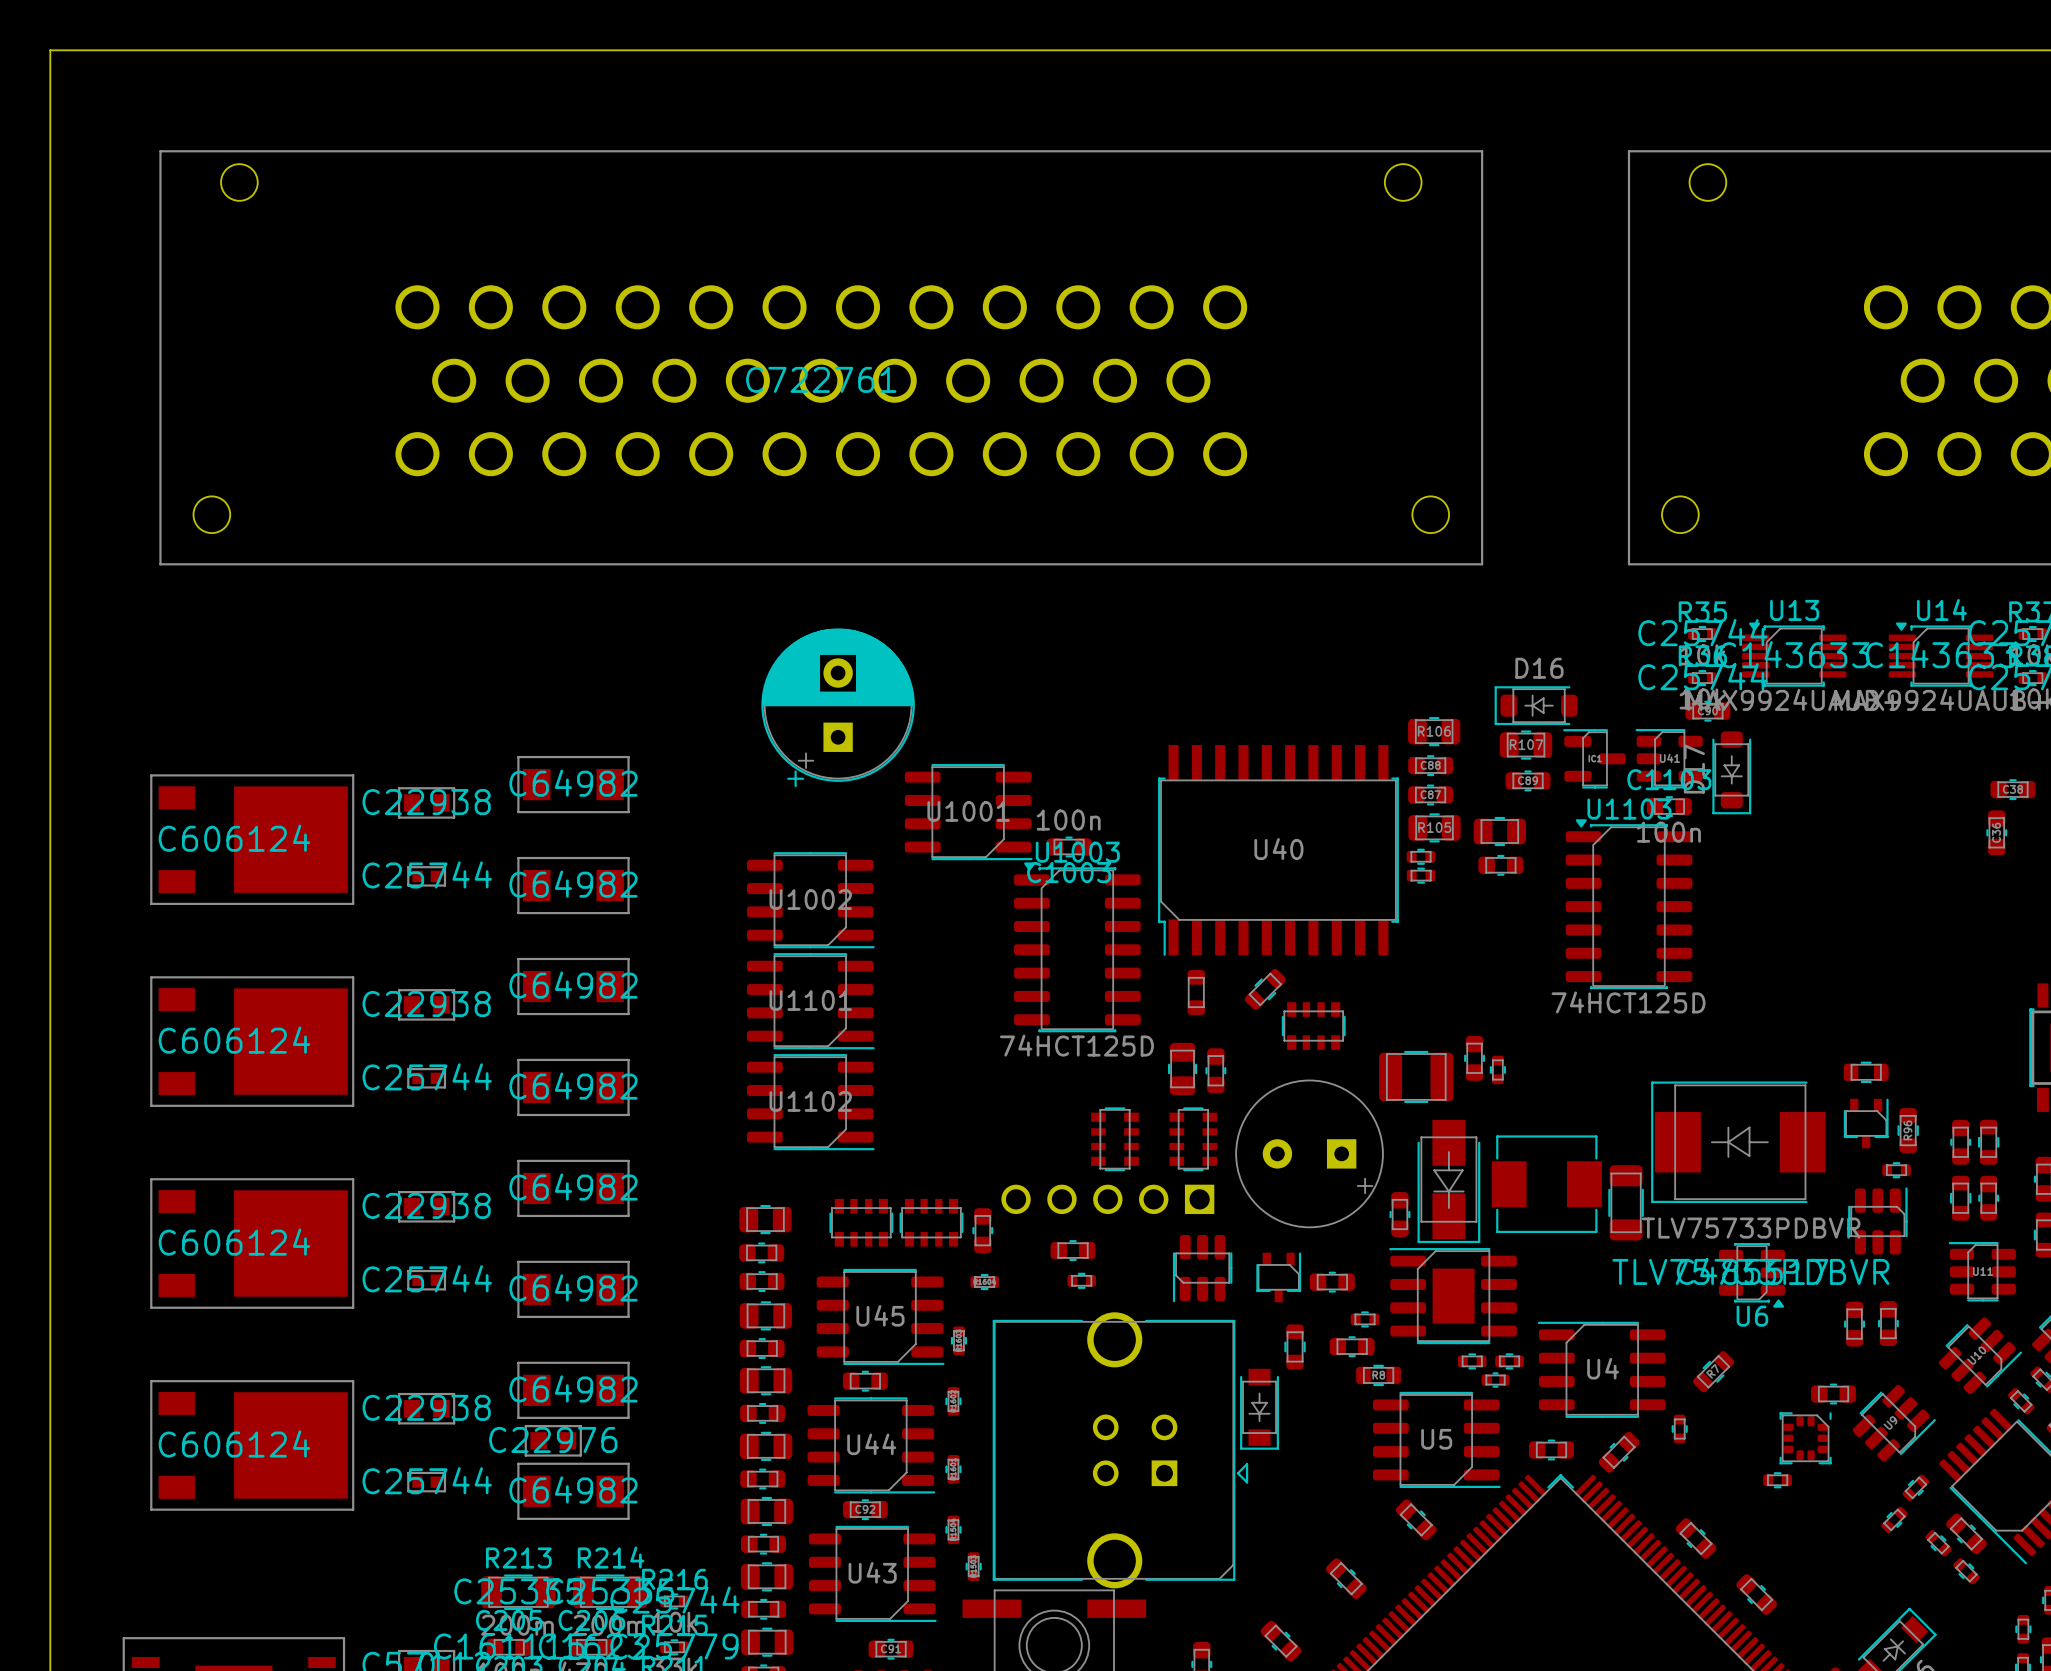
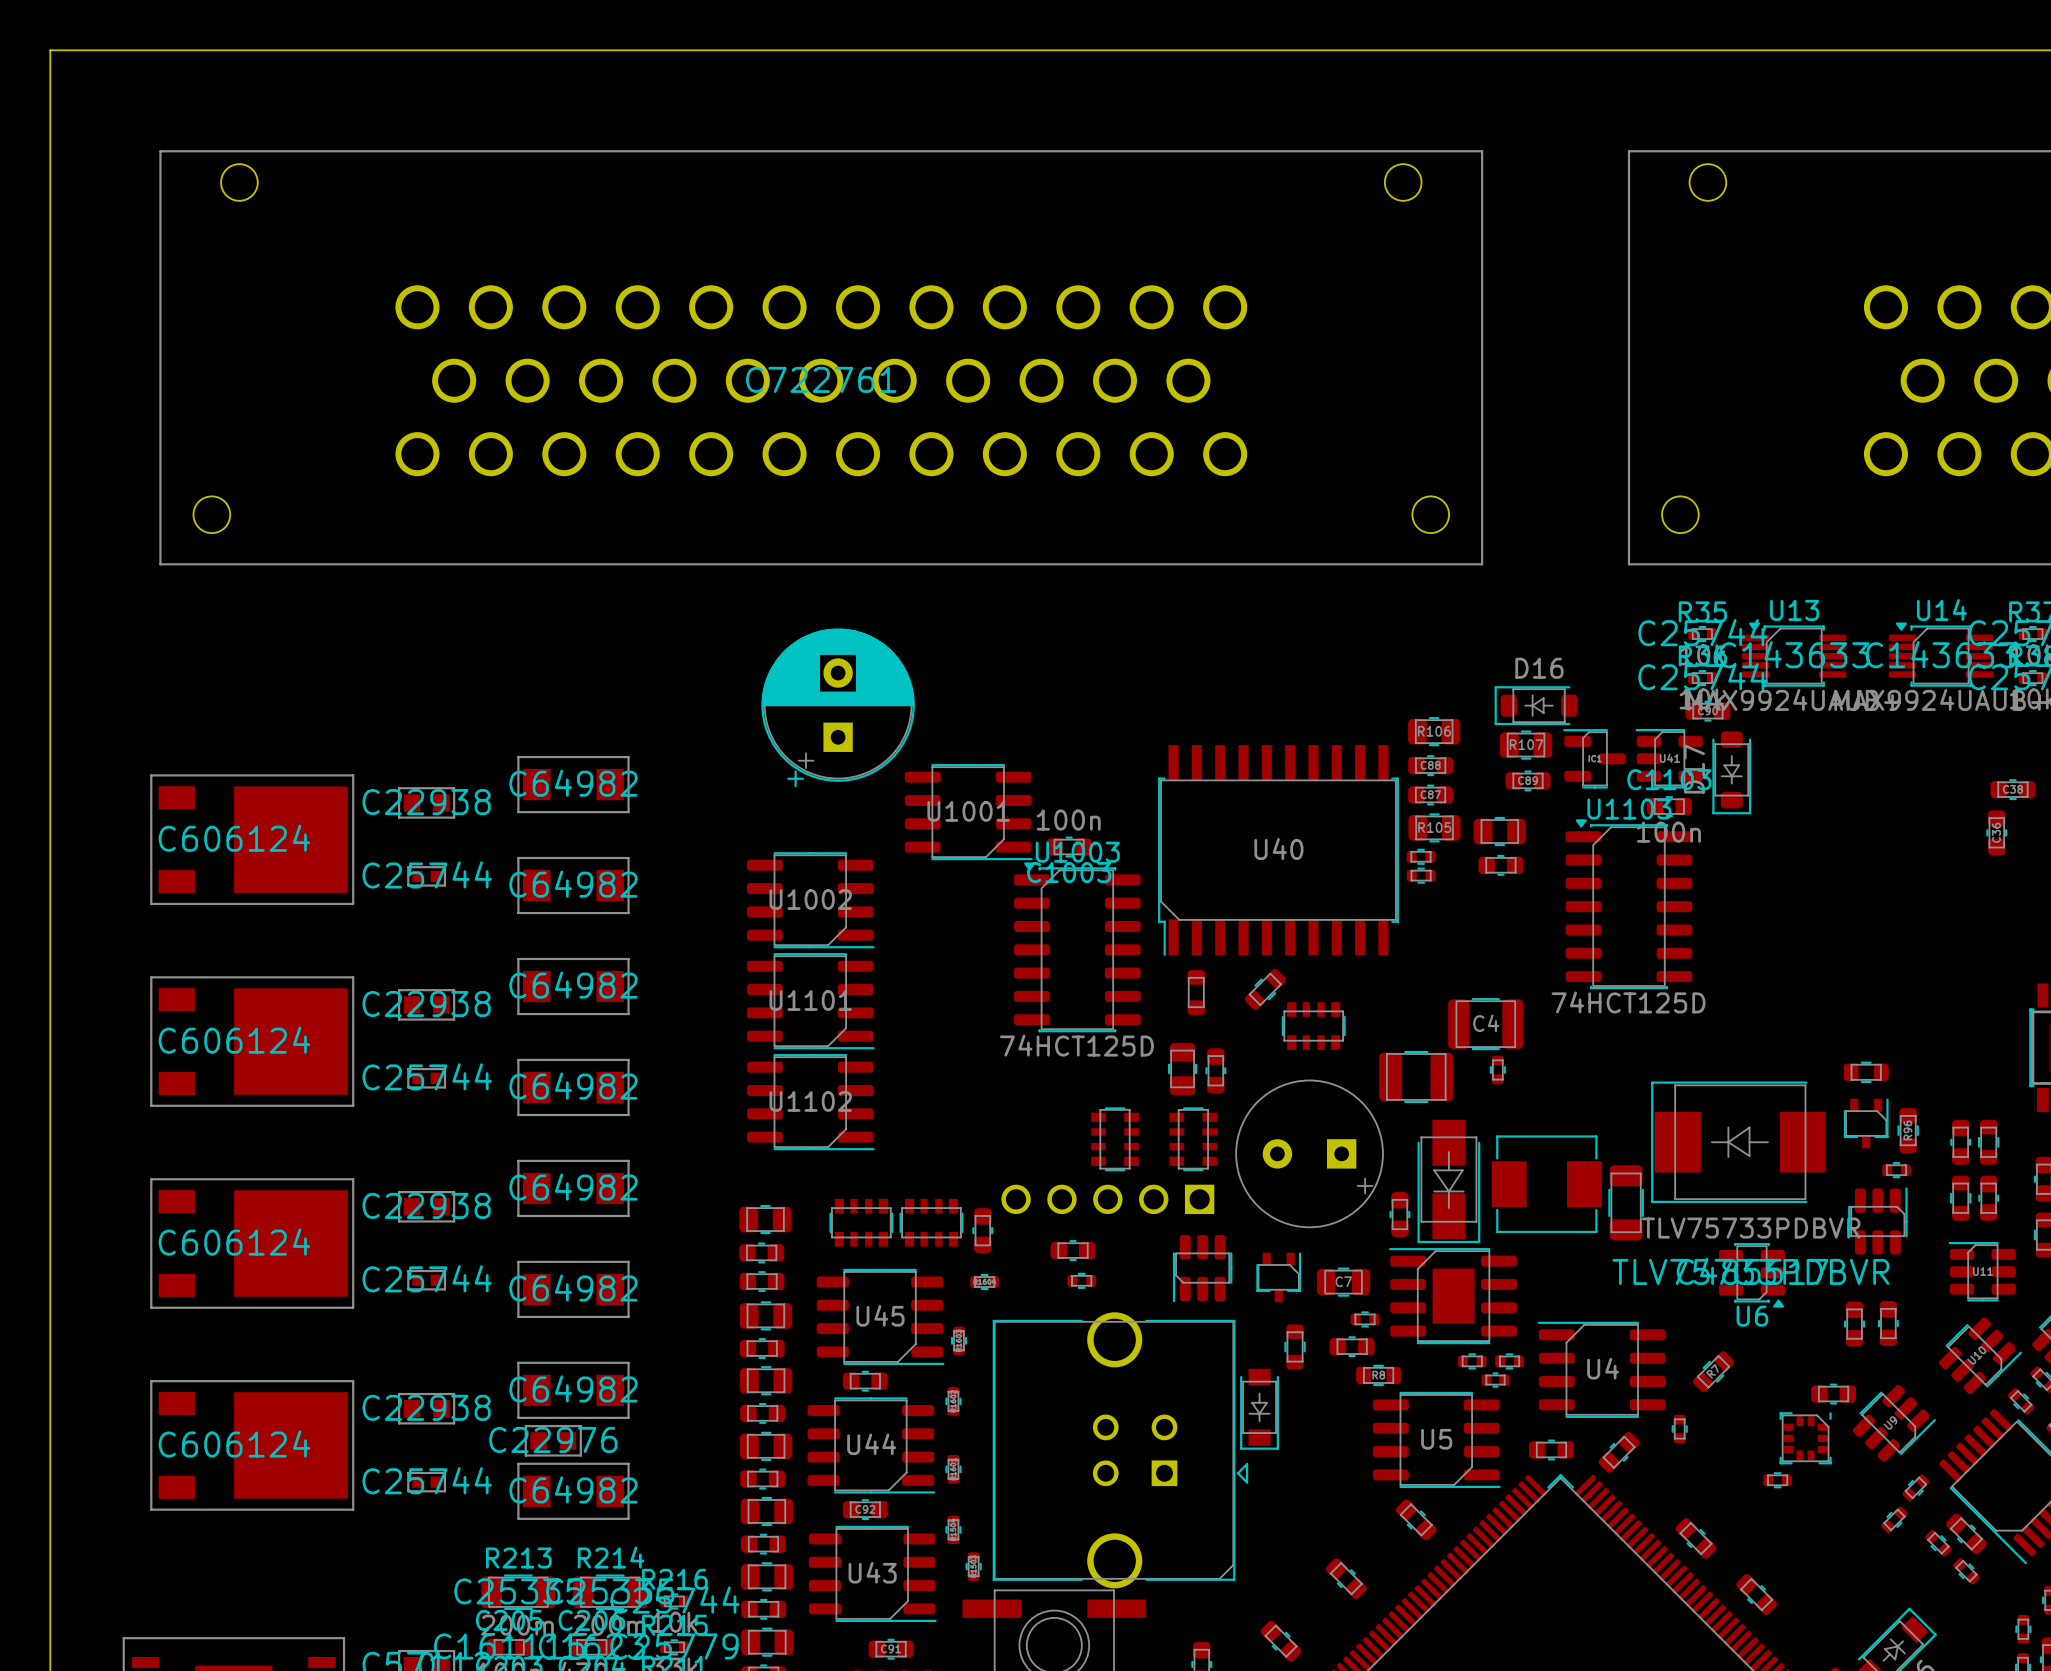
C4: none -> (1485, 1024)
part: (1474, 1058) -> none
part: (1332, 1282) -> none
C7: none -> (1343, 1282)

